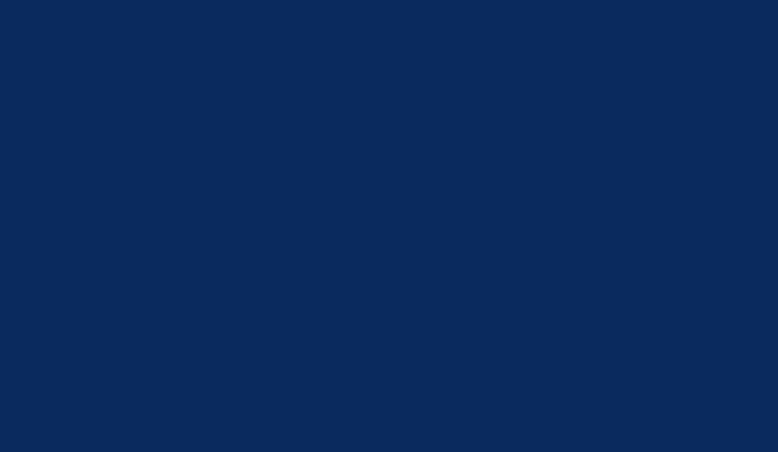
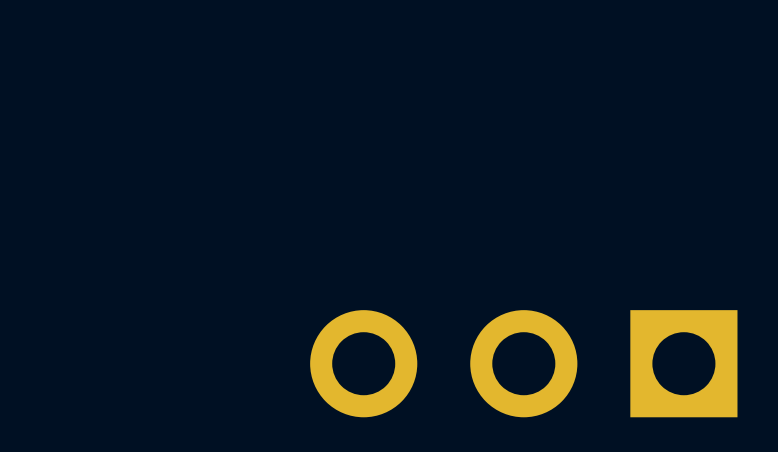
part: none -> (523, 363)

